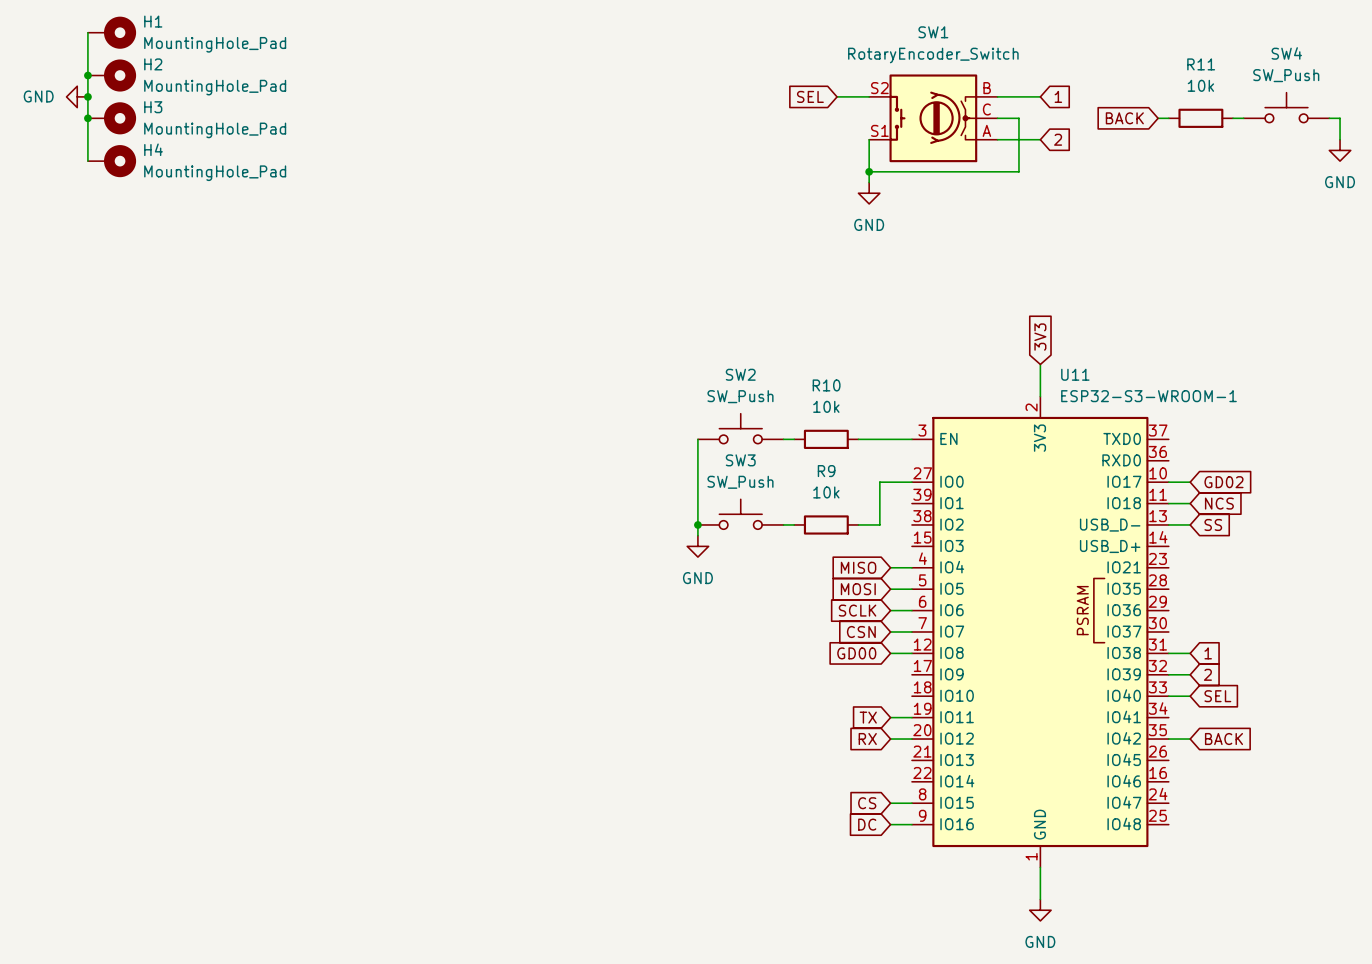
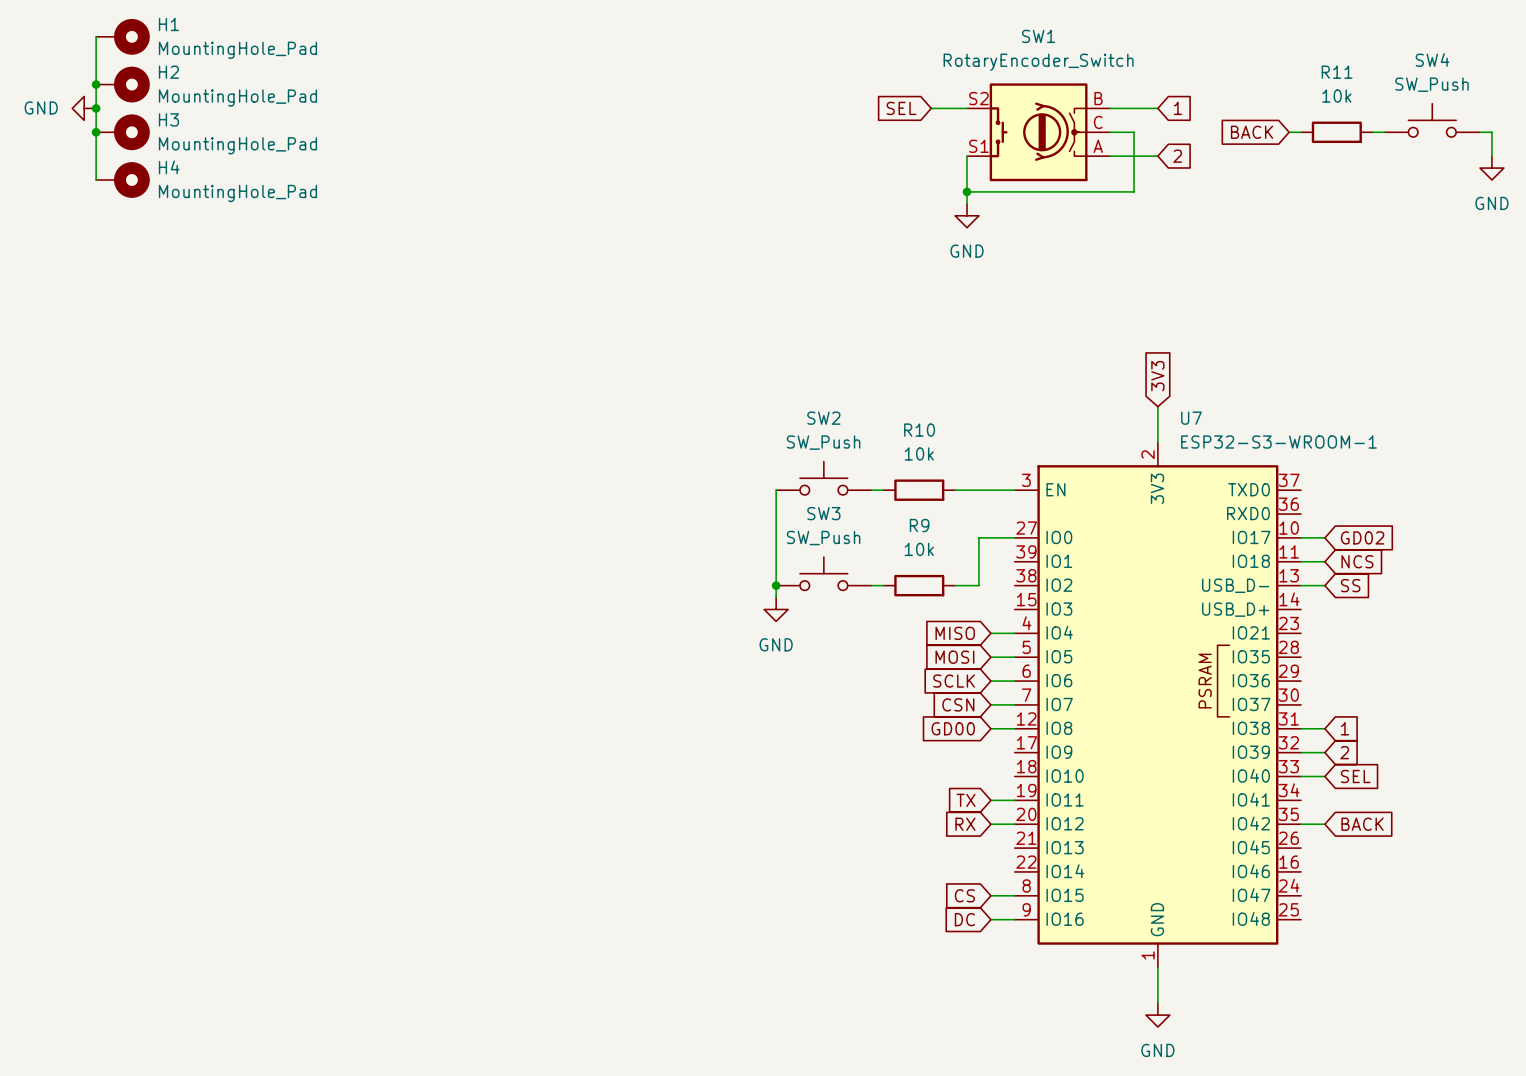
U11 name: U11 (1075, 374) -> U7 (1191, 418)

